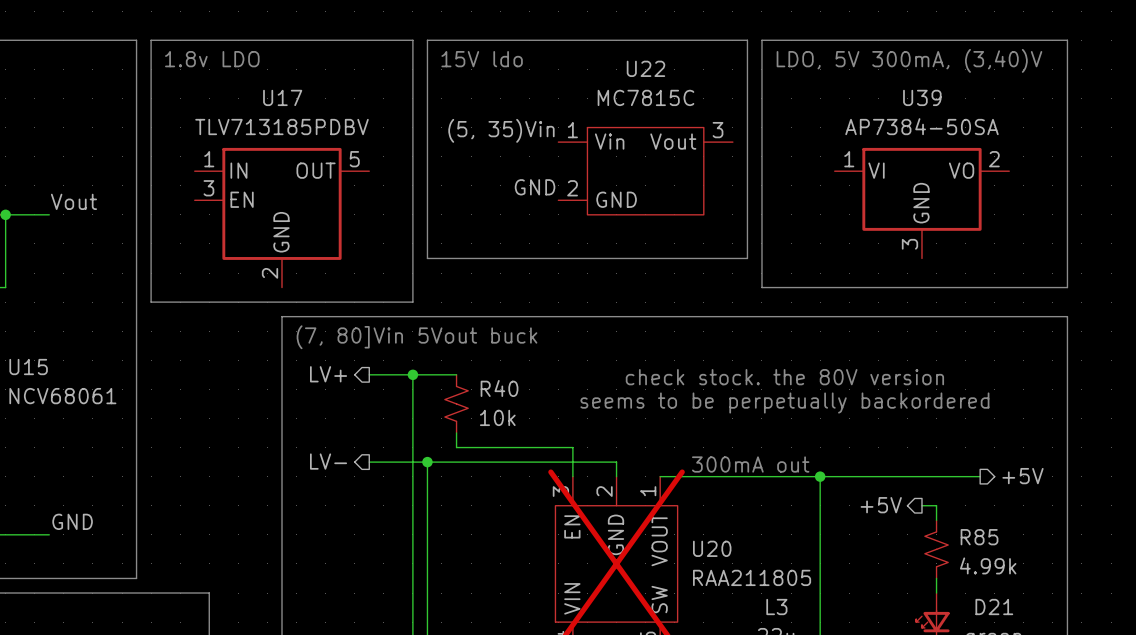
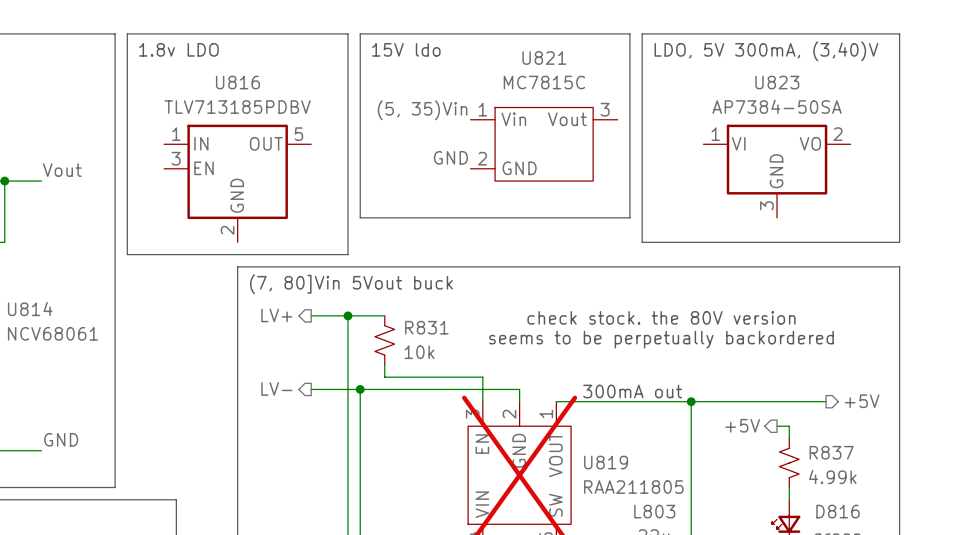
U22 name: U22 (645, 68) -> U821 (544, 58)
U17 name: U17 (282, 97) -> U816 (237, 82)
U39 name: U39 (922, 97) -> U823 (777, 82)
U15 name: U15 (28, 367) -> U814 (30, 309)
R40 name: R40 (499, 388) -> R831 (426, 327)
R85 name: R85 (979, 537) -> R837 (831, 452)
U20 name: U20 (712, 548) -> U819 (606, 462)
L3 name: L3 (776, 607) -> L803 (654, 511)
D21 name: D21 (994, 607) -> D816 (838, 511)

